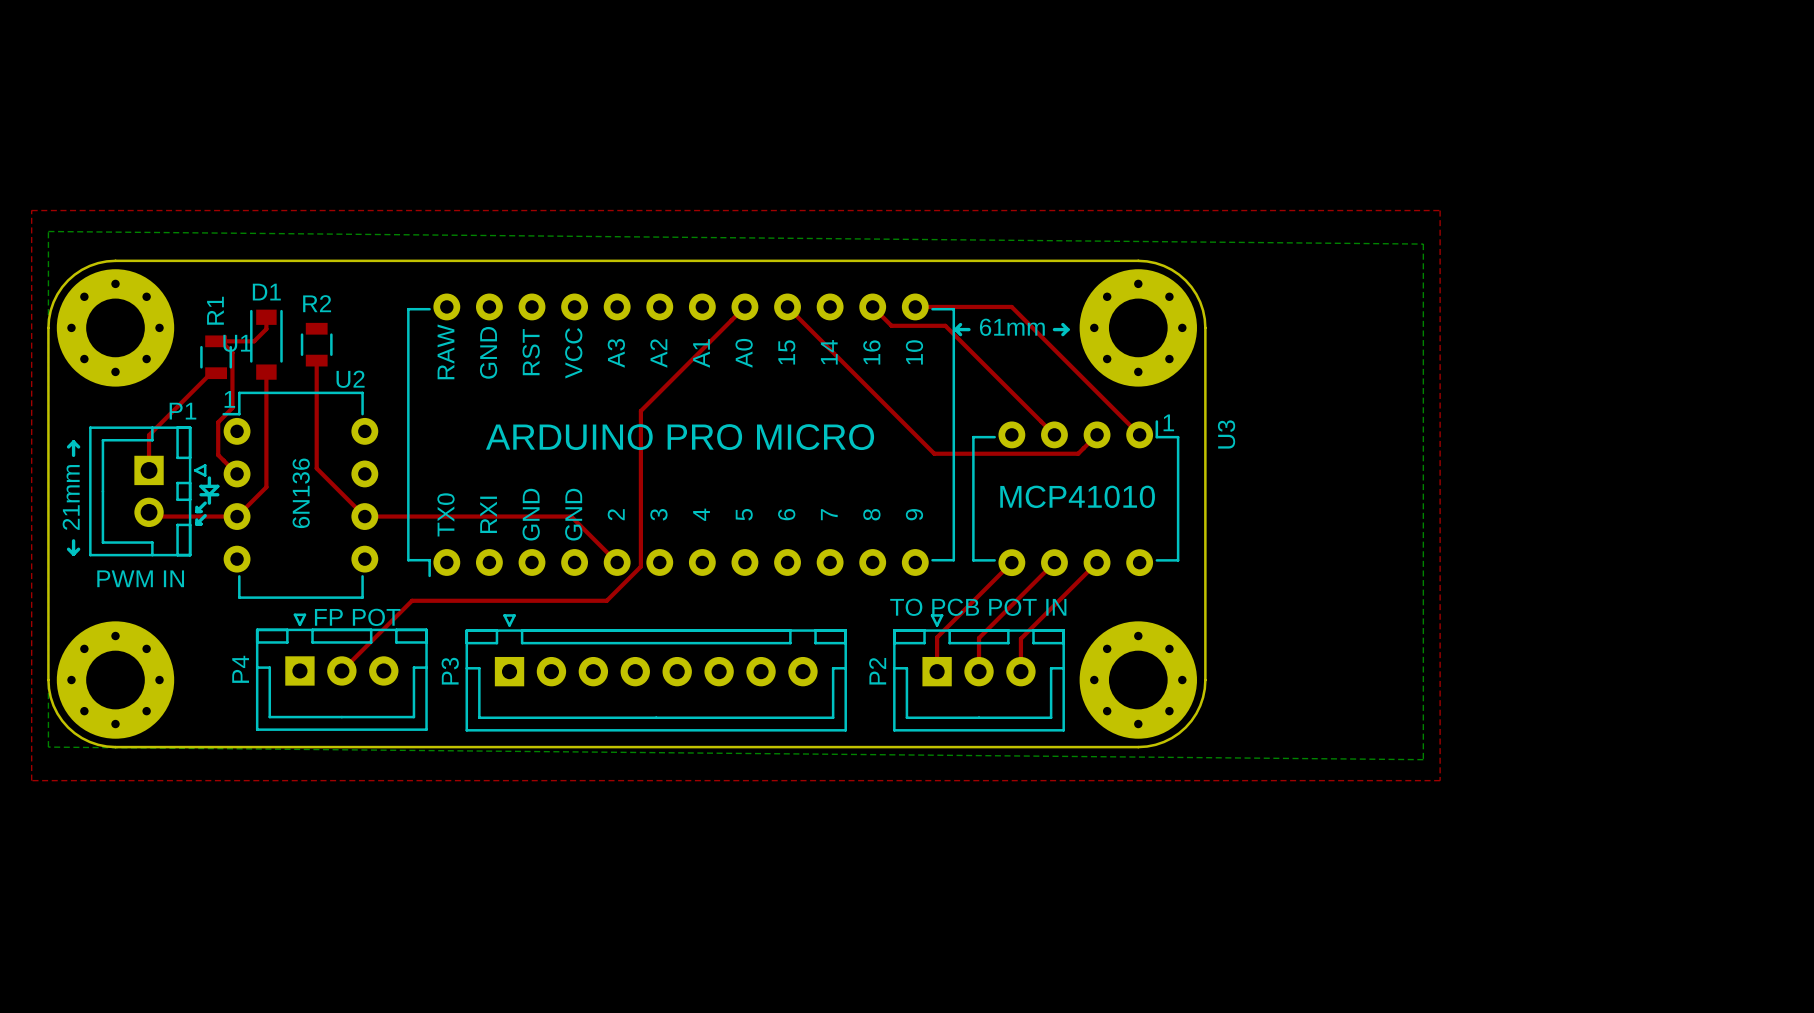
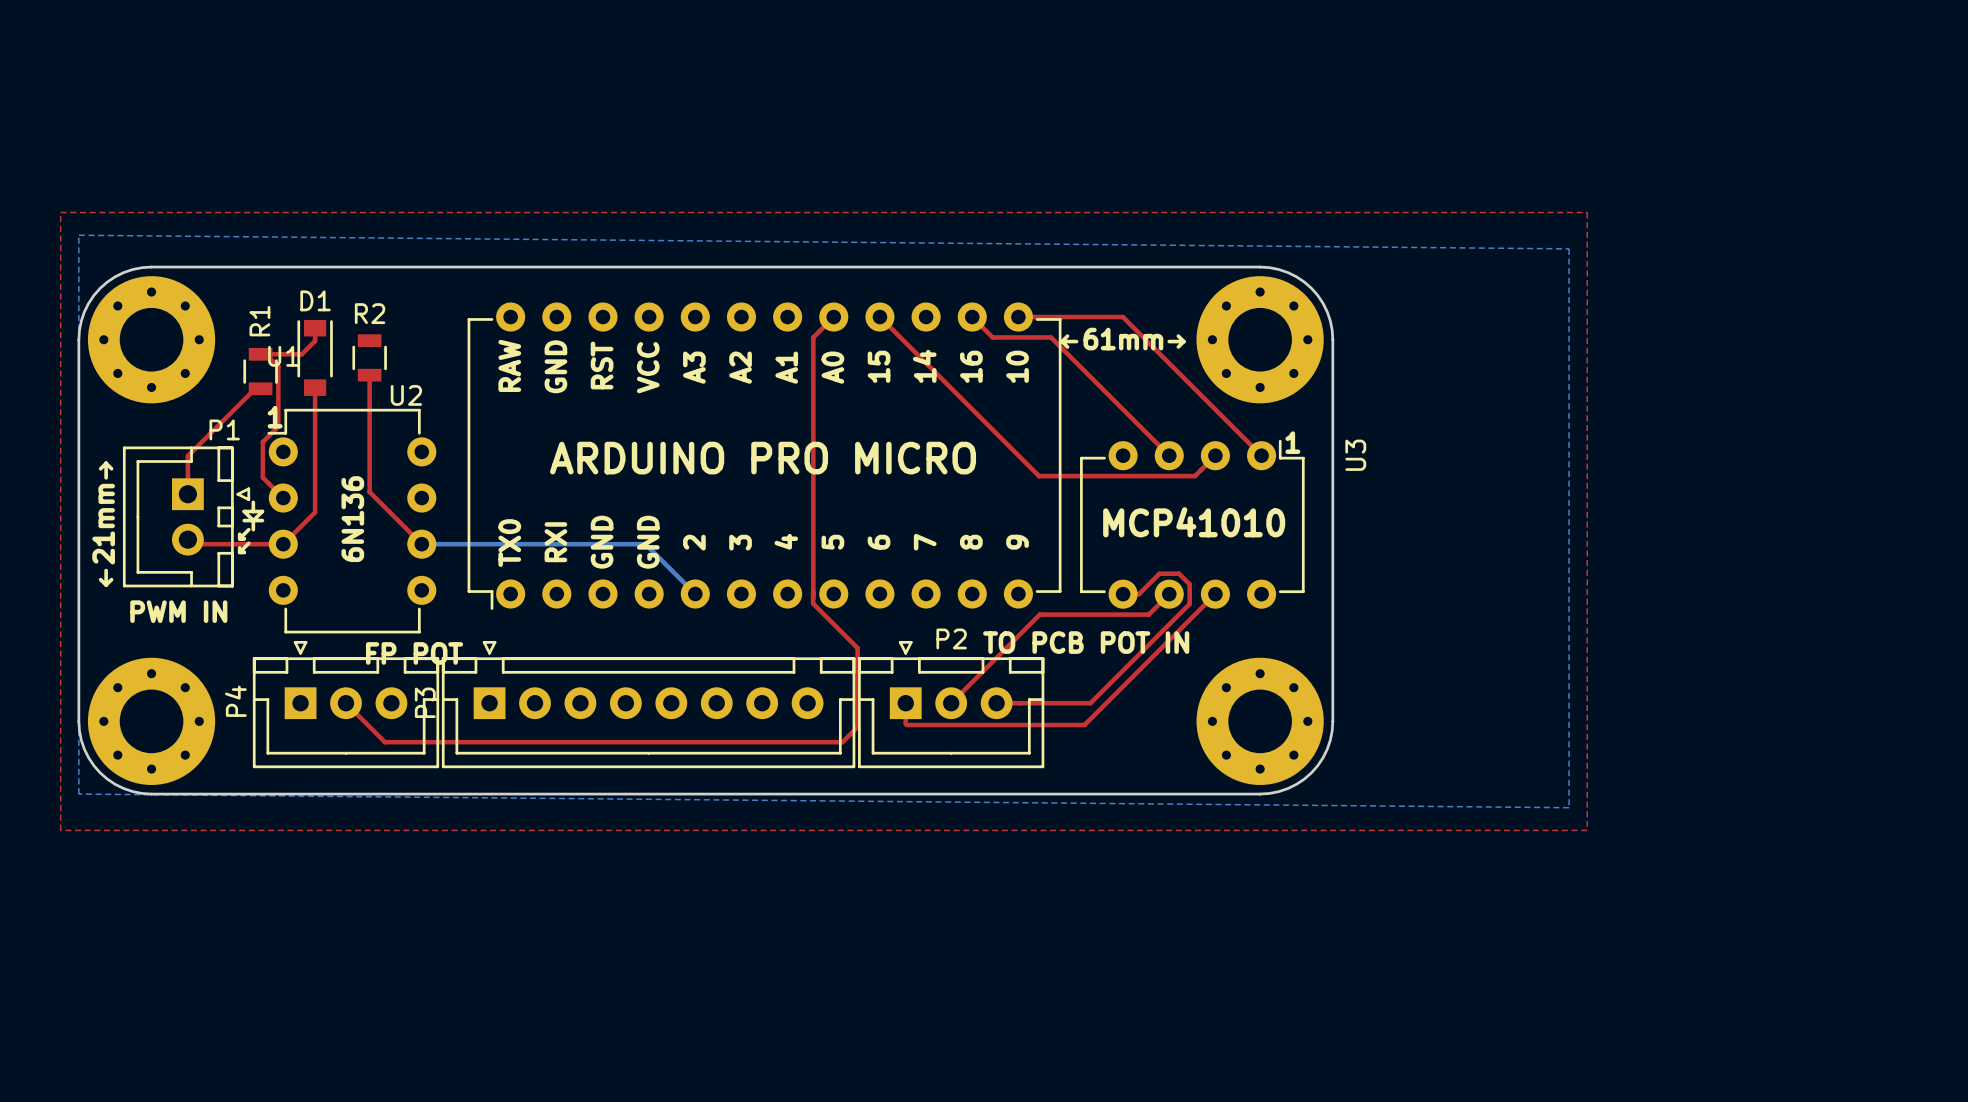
top track: (726, 325) (640, 410) (640, 566) (606, 600) (412, 600) (341, 670) -> (813, 337) (813, 598)
top track: (364, 516) (571, 516) (617, 562) -> none
bottom track: none -> (421, 544) (645, 544) (695, 593)
top track: none -> (813, 592) (813, 603) (857, 648) (857, 727) (842, 742) (384, 742) (346, 703)
top track: (1011, 562) (937, 637) (937, 671) -> (1123, 594) (1139, 594) (1159, 573) (1179, 573) (1189, 584) (1189, 603) (1090, 703) (996, 703)
top track: (1035, 581) (979, 638) (979, 671) -> (1148, 614) (1039, 614) (951, 703)
top track: (1020, 638) (1020, 671) -> (1132, 676) (1084, 725) (907, 725) (905, 703)
P2 name rotation: 0° (877, 671) -> 90° clockwise (951, 638)
P2 name position: P2 (877, 671) -> P2 (951, 638)
P4 position: (341, 672) -> (346, 704)
P3 position: (656, 672) -> (648, 704)
P2 position: (979, 672) -> (951, 704)

